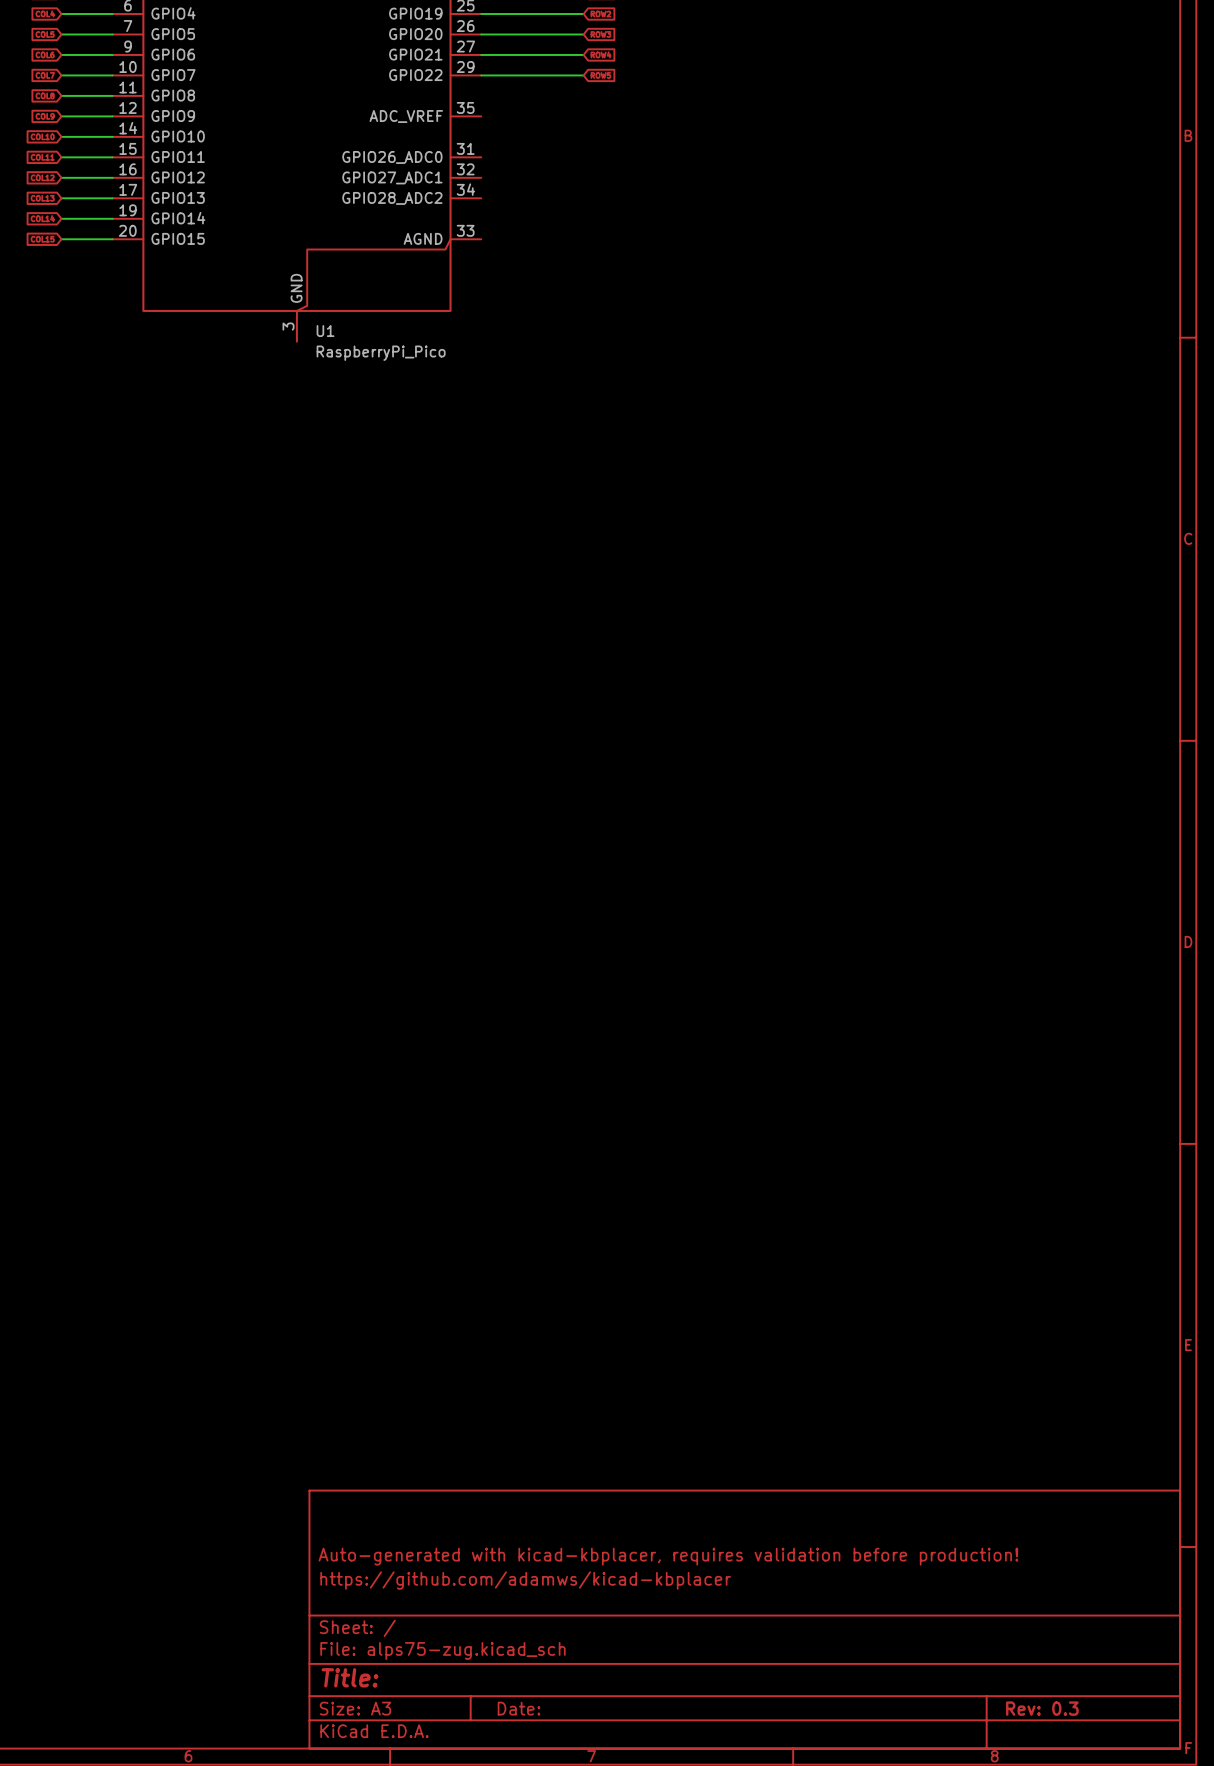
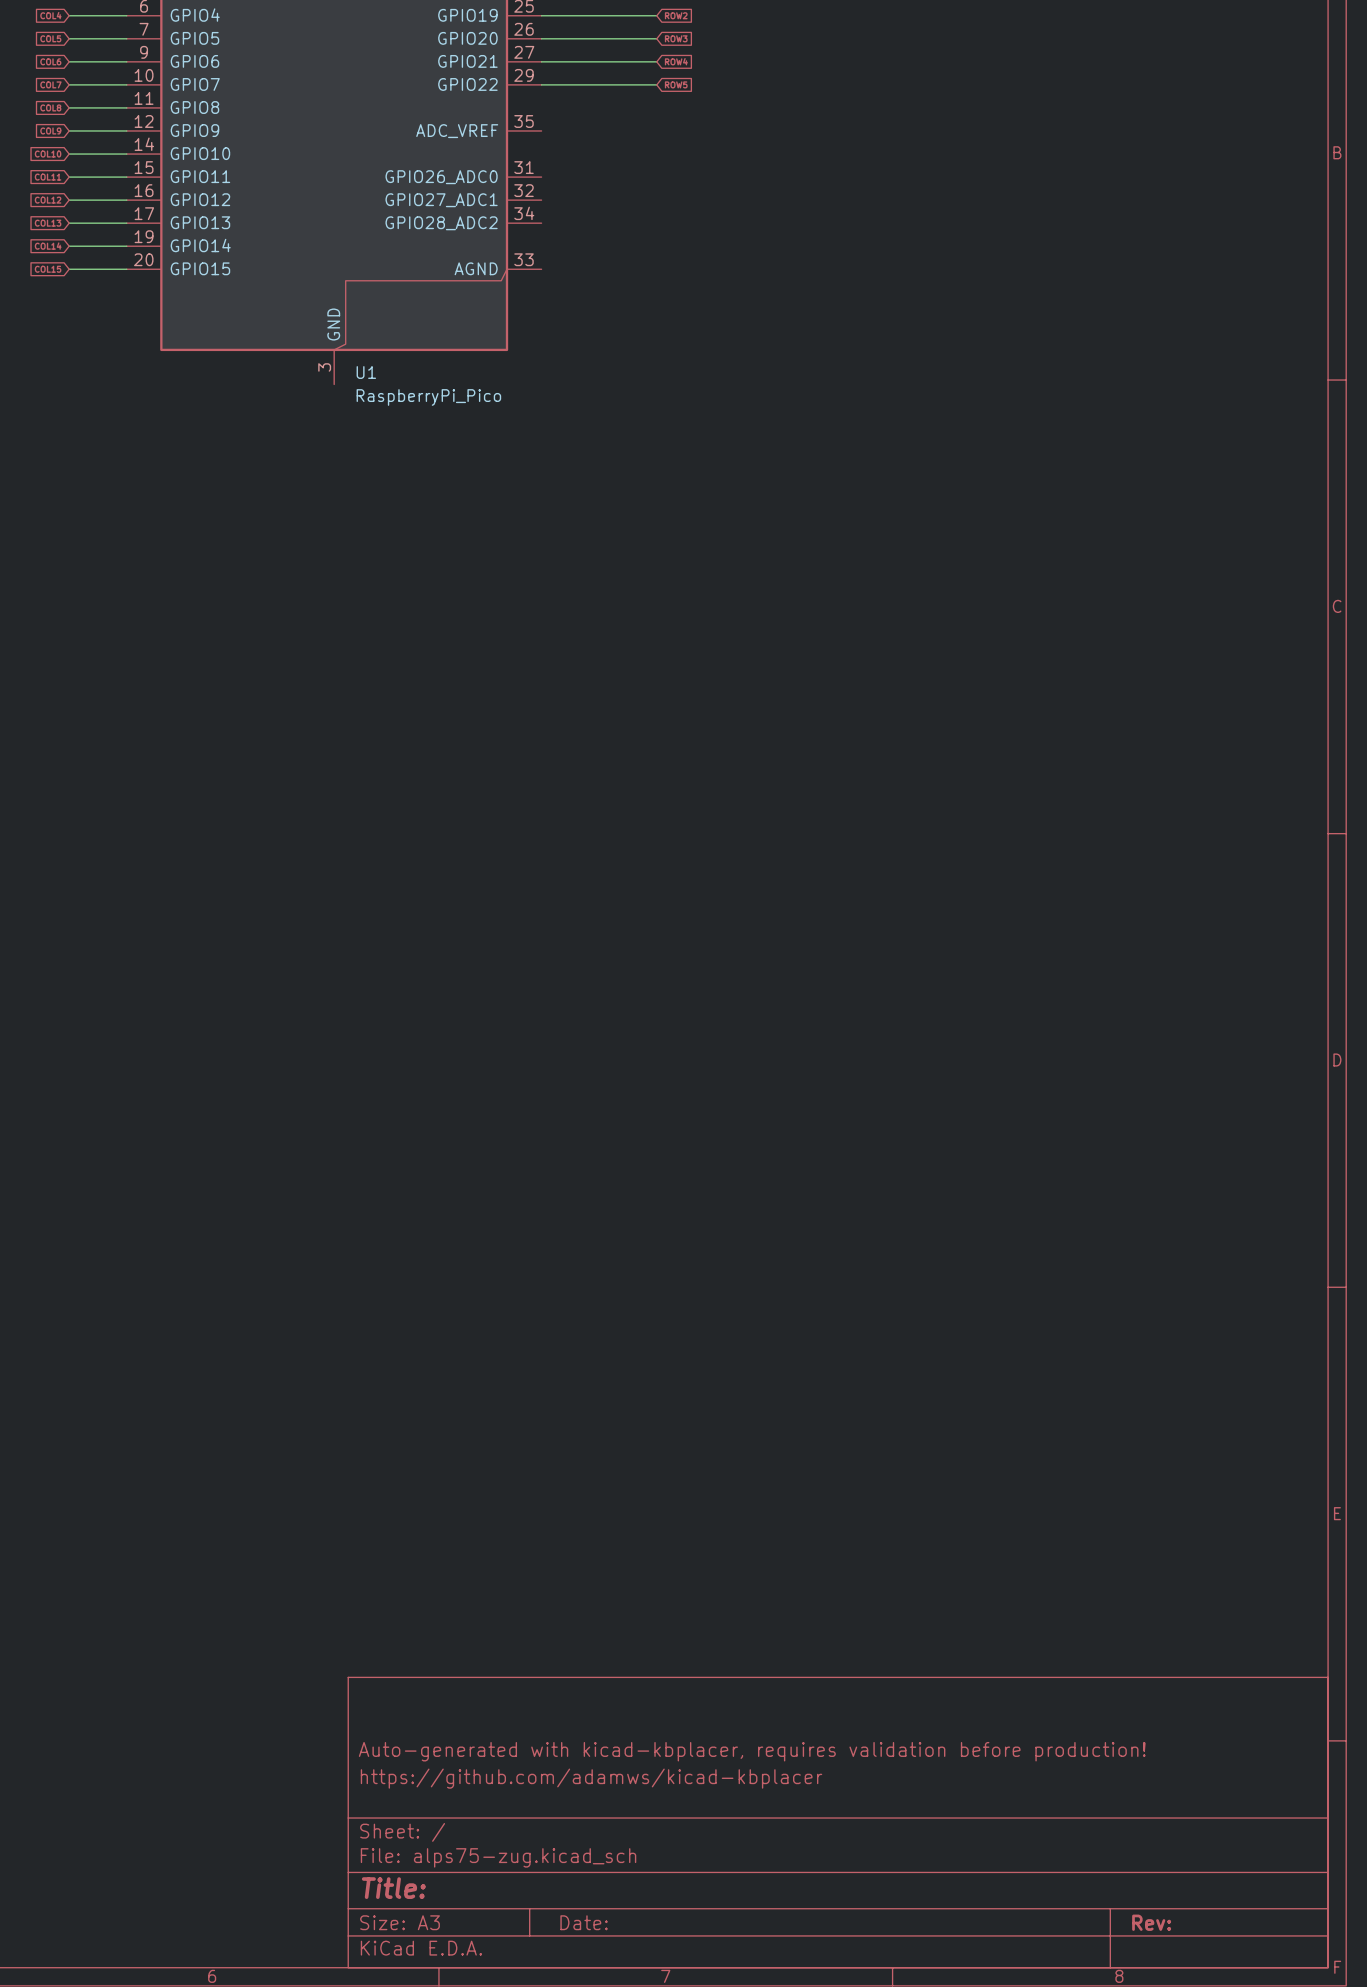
title block: Rev: 0.3 (1042, 1708) -> Rev: (1151, 1922)

